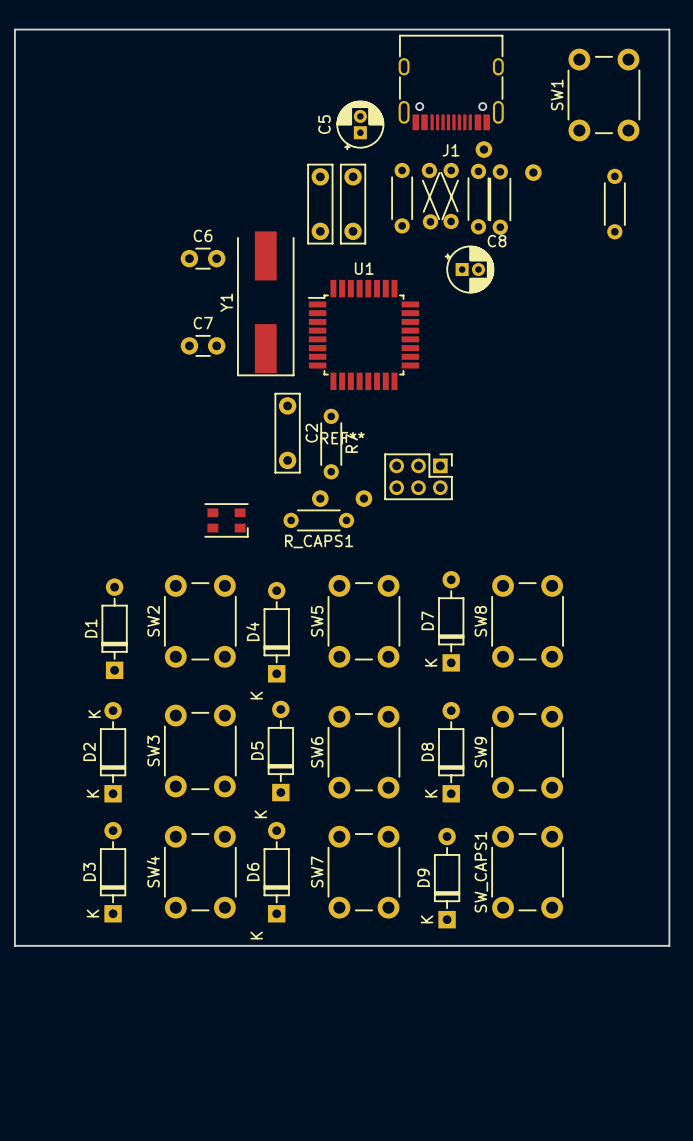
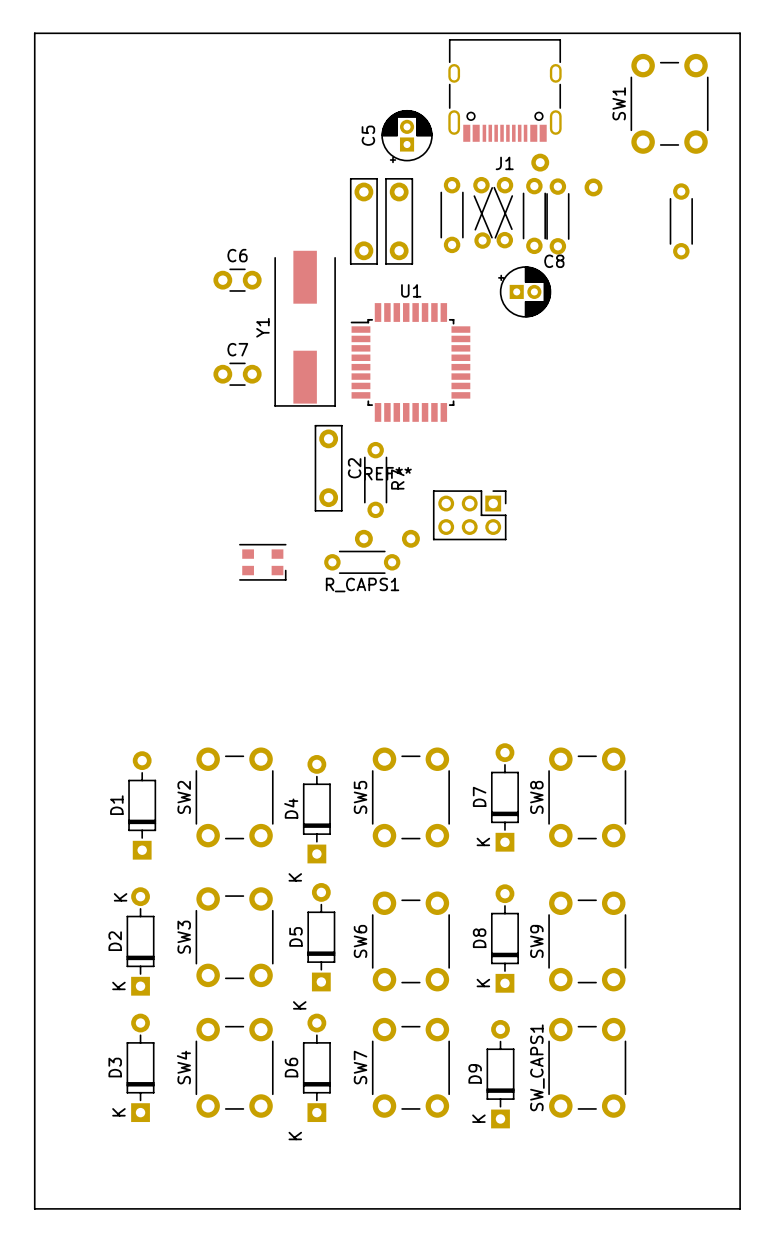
SW2 position: (200, 621) -> (234, 797)
SW5 position: (363, 621) -> (410, 797)
D7 position: (451, 621) -> (504, 797)
SW8 position: (527, 621) -> (587, 797)
D1 position: (114, 628) -> (142, 805)
D4 position: (276, 632) -> (316, 809)
SW3 position: (200, 751) -> (234, 937)
D5 position: (280, 751) -> (321, 937)
D2: (113, 752) -> none
SW6: (363, 752) -> none
D8 position: (451, 752) -> (504, 938)
SW9: (527, 752) -> none
D3 name: D3 (89, 871) -> D2 (115, 941)
SW7 name: SW7 (317, 871) -> SW6 (360, 941)
SW4 position: (200, 872) -> (234, 1067)
D6 position: (276, 872) -> (316, 1067)
SW_CAPS1 name: SW_CAPS1 (481, 872) -> SW9 (536, 941)
D9 position: (447, 878) -> (500, 1074)
board edge: (14, 945) (669, 945) -> (34, 1020) (34, 1208) (740, 1208) (740, 1020)
D3: none -> (140, 1067)
SW7: none -> (410, 1067)
SW_CAPS1: none -> (587, 1067)

